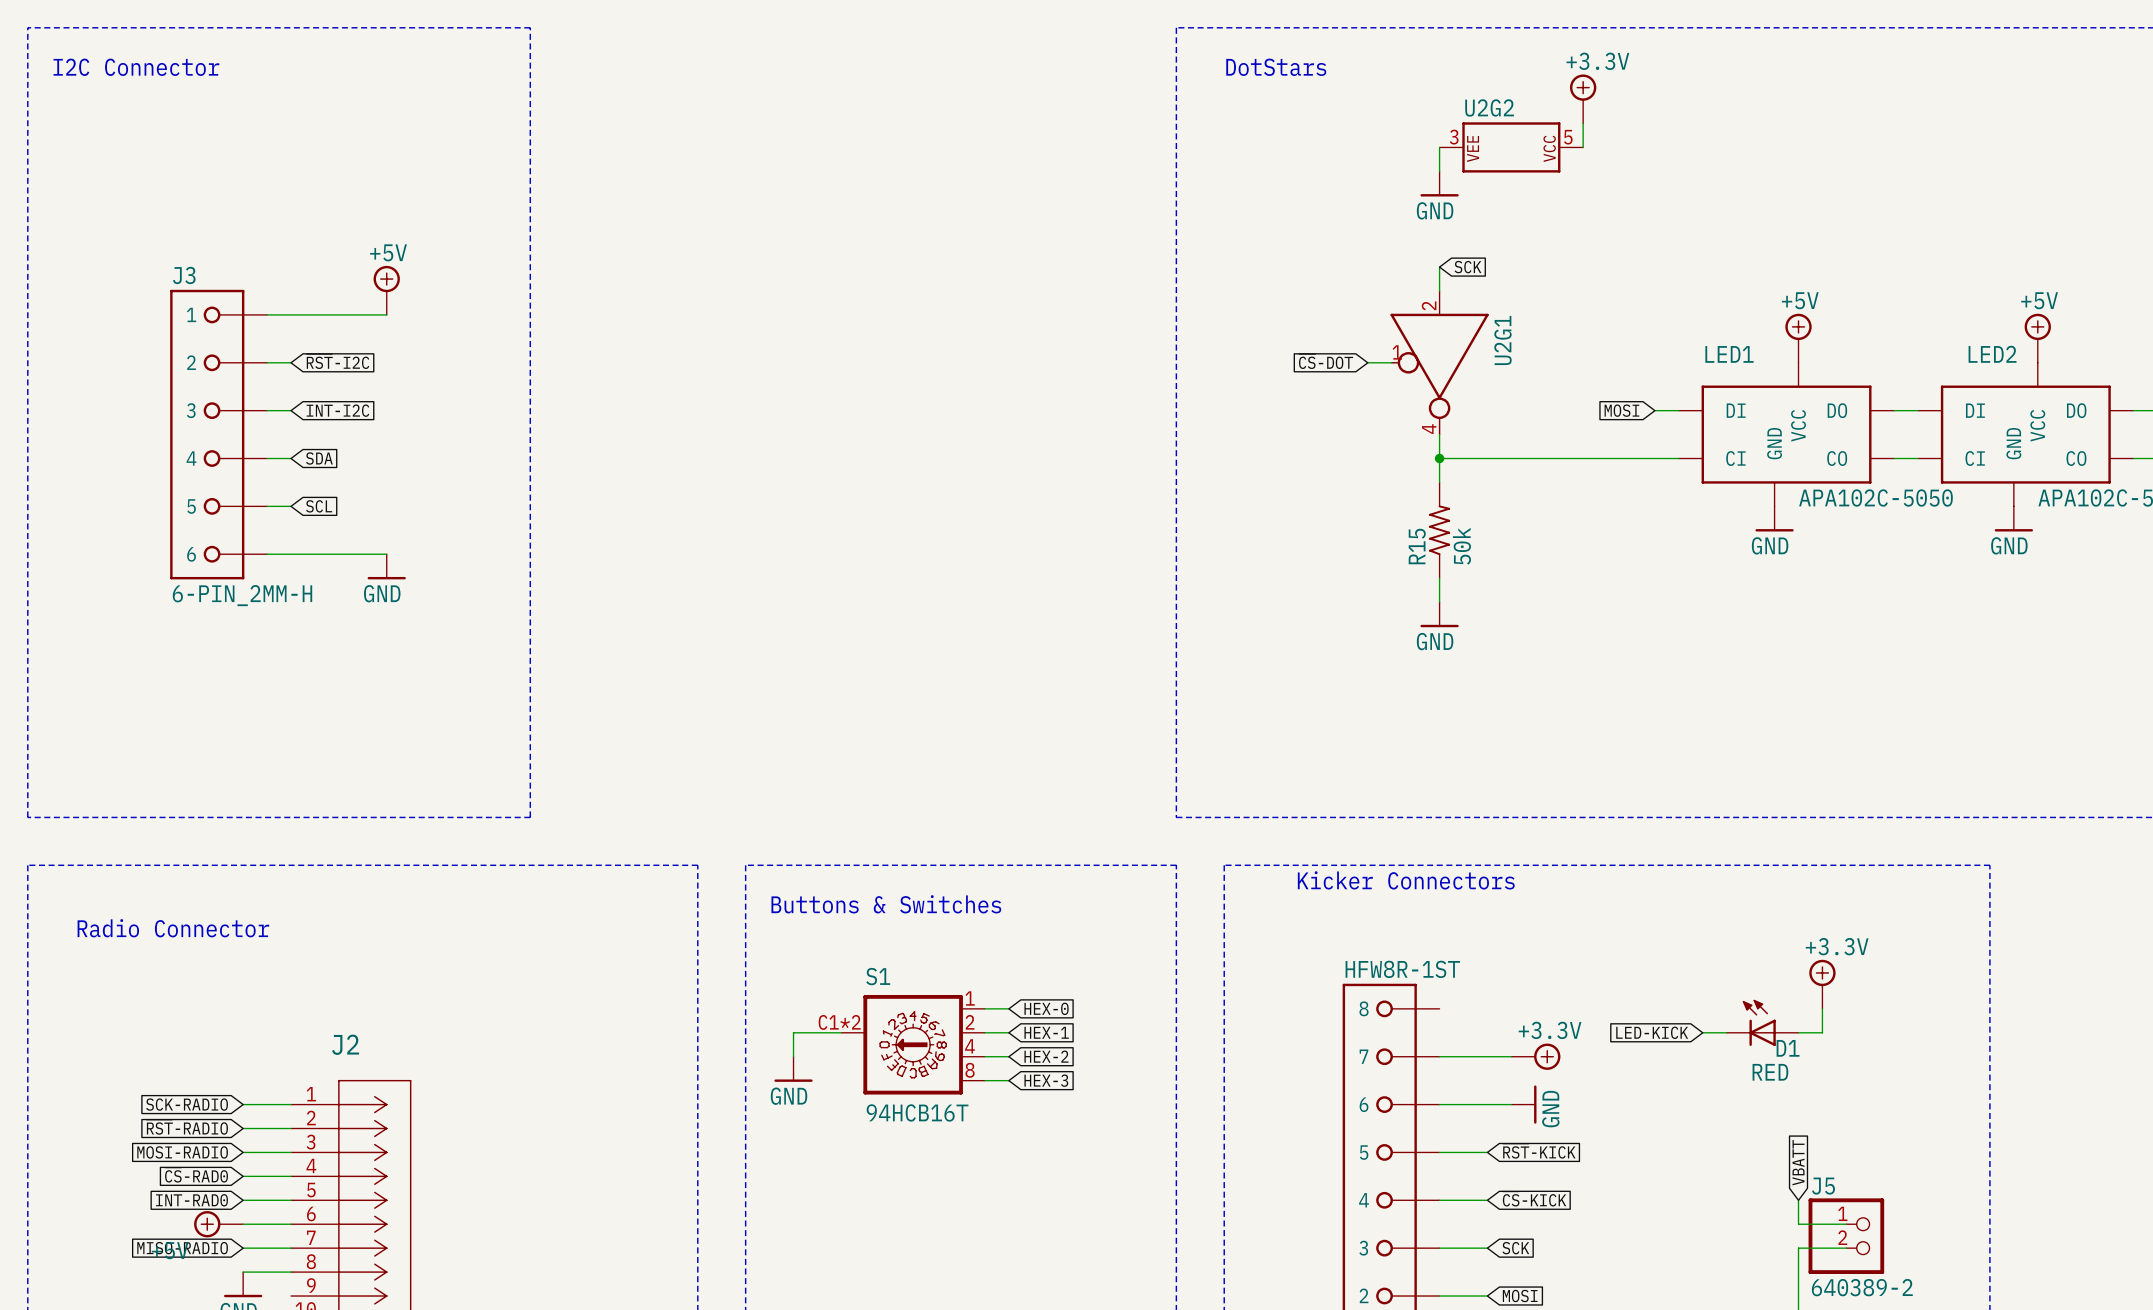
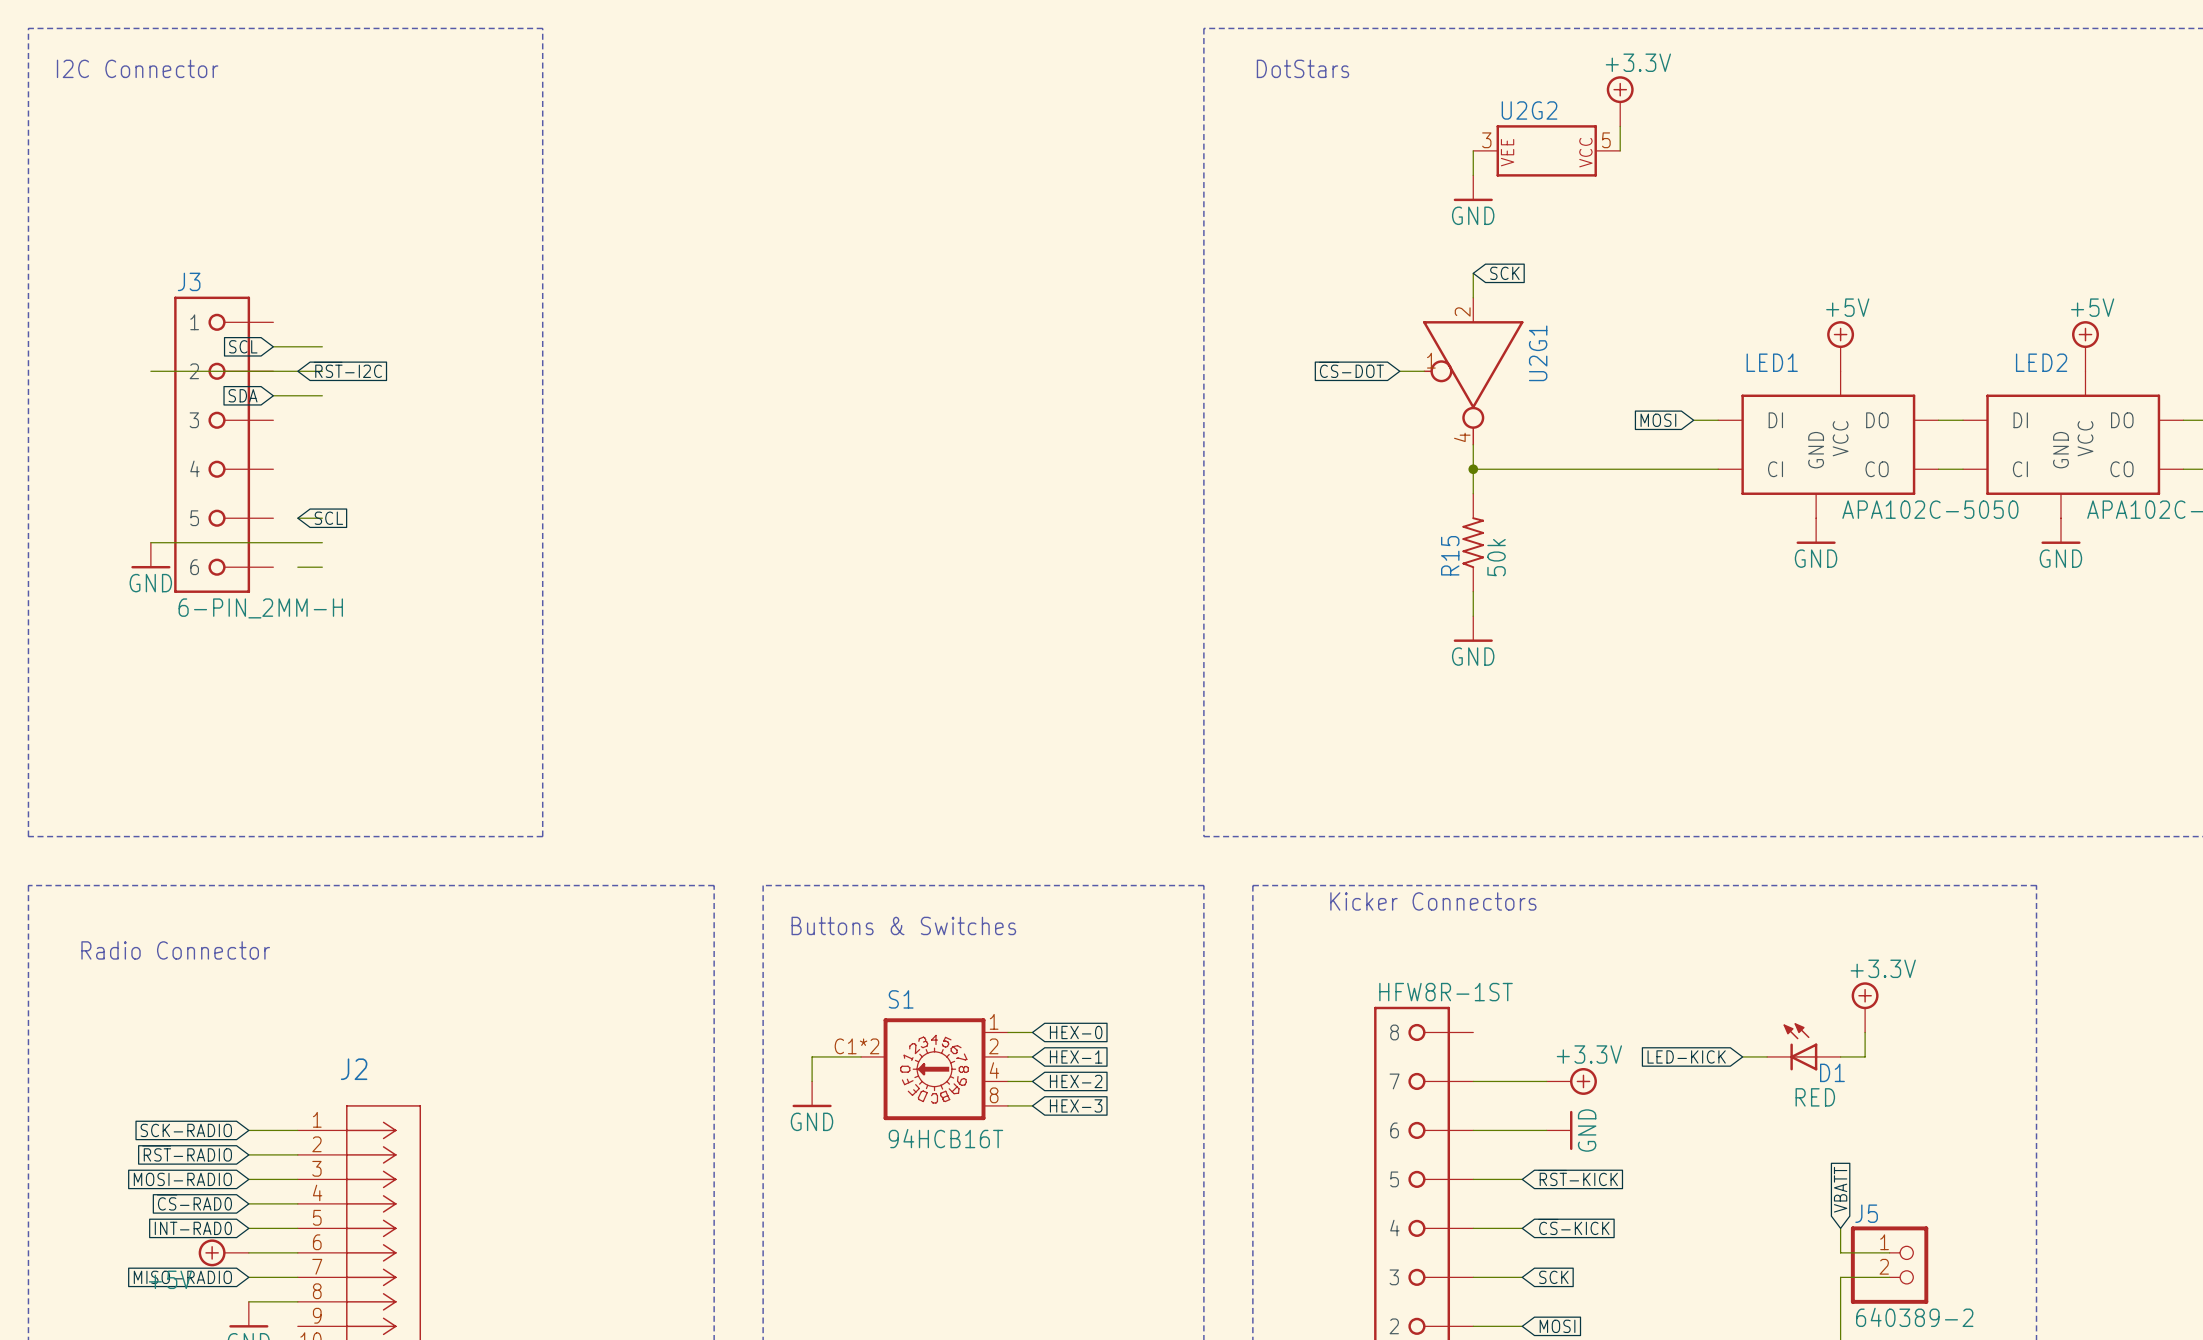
power symbol: +5V (386, 290) -> none
wire: (267, 314) (386, 314) -> (150, 371) (273, 371)
global label: none -> SCL (243, 346)
wire: none -> (273, 346) (322, 346)
wire: none -> (273, 395) (322, 395)
wire: (267, 410) (291, 410) -> (297, 371) (322, 371)
global label: INT-I2C (337, 410) -> none
wire: (267, 458) (291, 458) -> none
global label rotation: 0° (319, 458) -> 180° (243, 395)
global label position: SDA (319, 458) -> SDA (243, 395)
wire: (267, 506) (291, 506) -> (322, 518) (297, 518)
wire: none -> (150, 542) (322, 542)
power symbol: none -> GND (150, 555)
wire: (267, 554) (291, 554) -> none
wire: (314, 554) (386, 554) -> none
power symbol: GND (386, 566) -> none

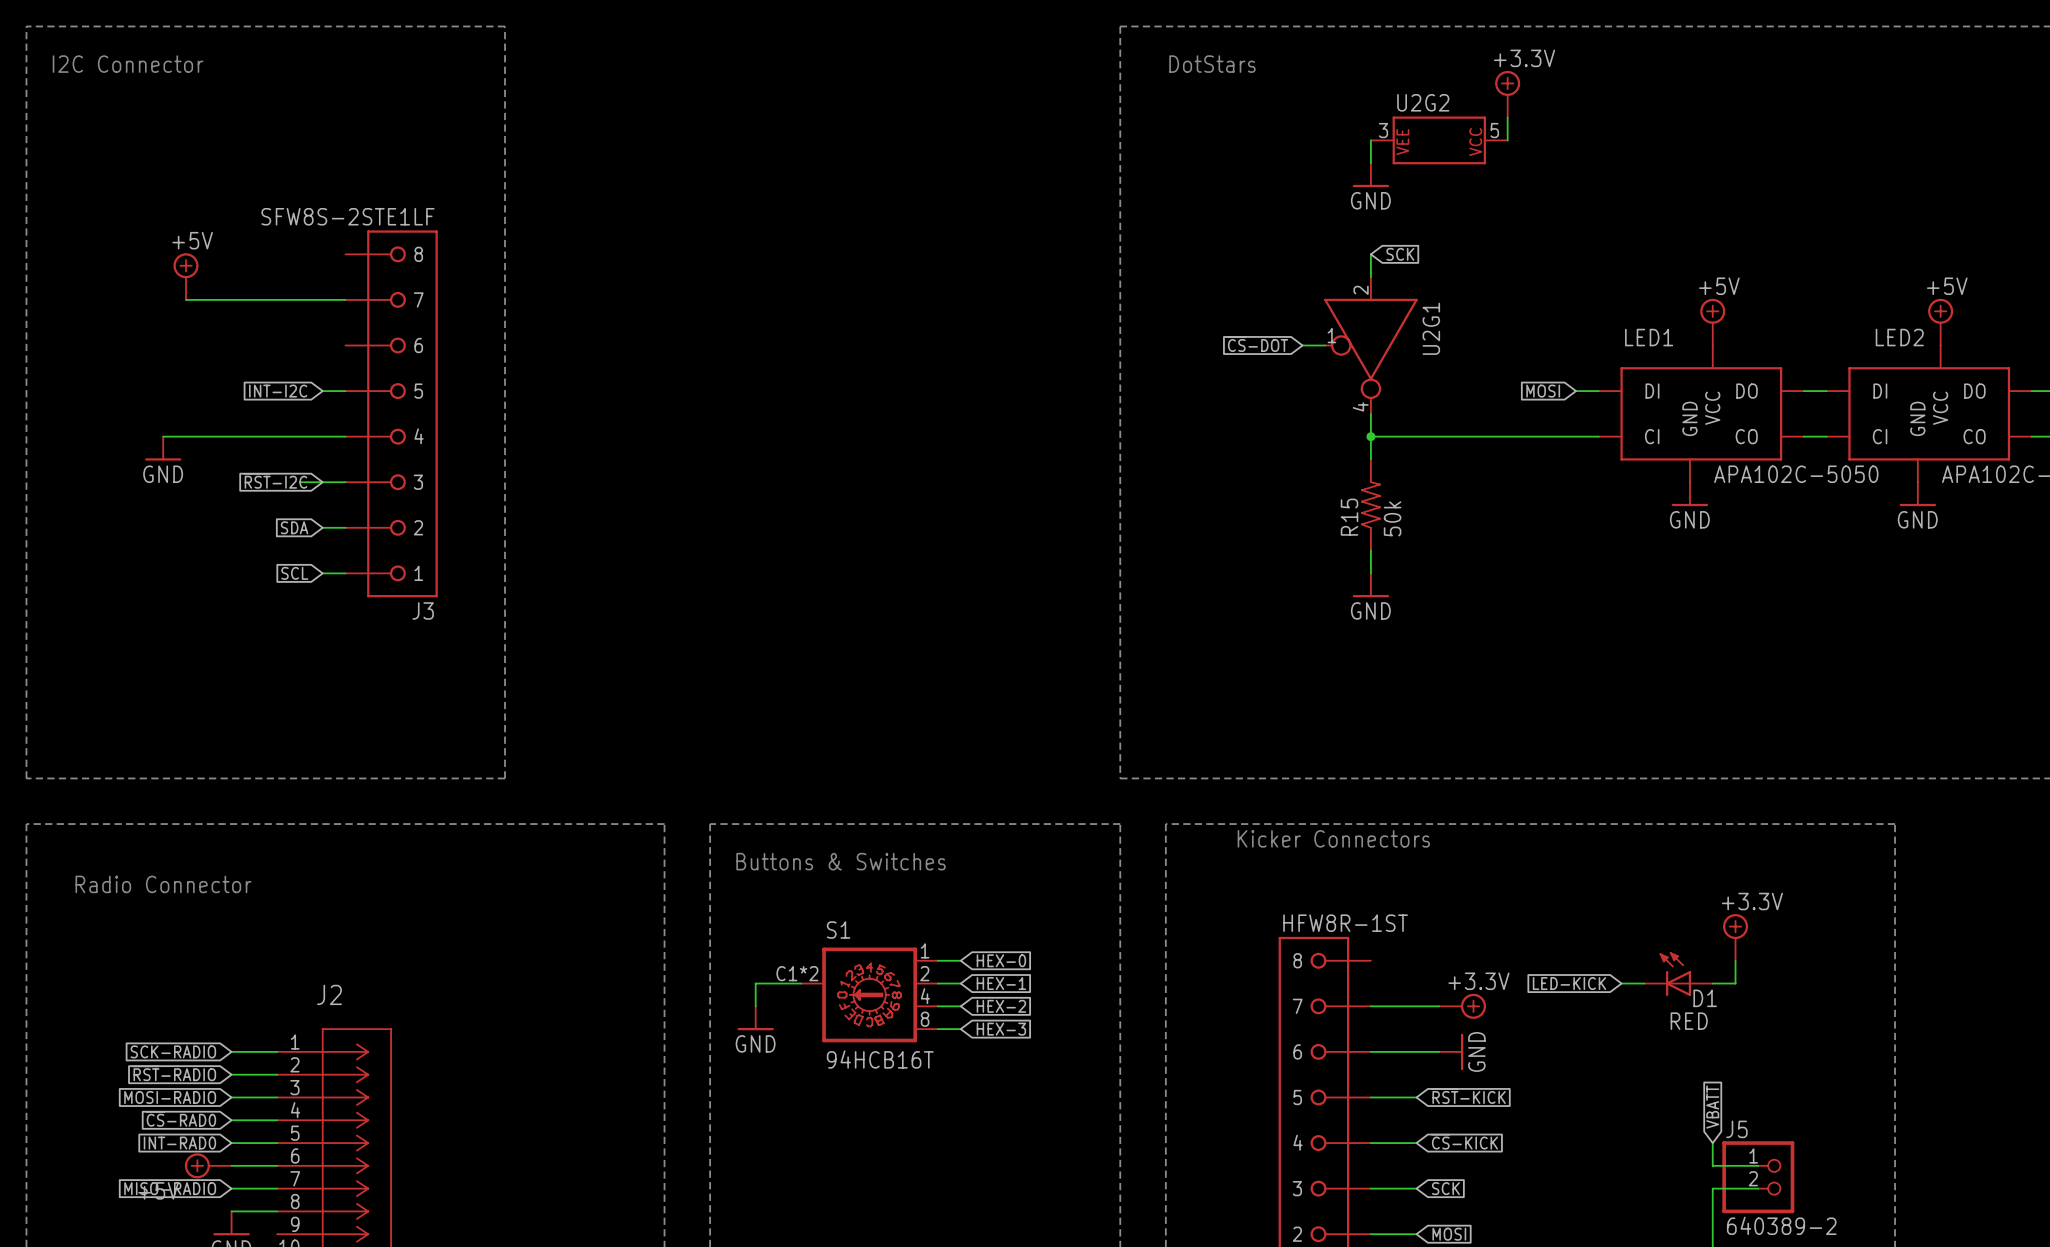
J3 name position: J3 (189, 281) -> J3 (423, 610)
J3 symbol: [174, 296, 274, 593] -> [345, 230, 438, 598]
power symbol: none -> +5V (185, 276)
global label: SCL (243, 346) -> none
wire: (273, 346) (322, 346) -> none
global label rotation: 0° (347, 369) -> 180° (275, 480)
global label position: ~{RST}-I2C (347, 369) -> ~{RST}-I2C (275, 480)
wire: (150, 371) (322, 371) -> (185, 299) (345, 299)
global label position: SDA (243, 395) -> SDA (294, 527)
wire: (273, 395) (322, 395) -> none
global label: none -> INT-I2C (278, 391)
wire: none -> (322, 391) (345, 391)
wire: none -> (163, 436) (345, 436)
wire: (297, 518) (322, 518) -> (345, 482) (299, 482)
global label rotation: 0° (328, 518) -> 180° (294, 573)
global label position: SCL (328, 518) -> SCL (294, 573)
wire: (150, 542) (322, 542) -> none
power symbol position: GND (150, 555) -> GND (163, 448)
wire: (297, 567) (322, 567) -> (322, 573) (345, 573)
wire: none -> (322, 527) (345, 527)
J3 value: 6-PIN_2MM-H (260, 608) -> SFW8S-2STE1LF (347, 216)

